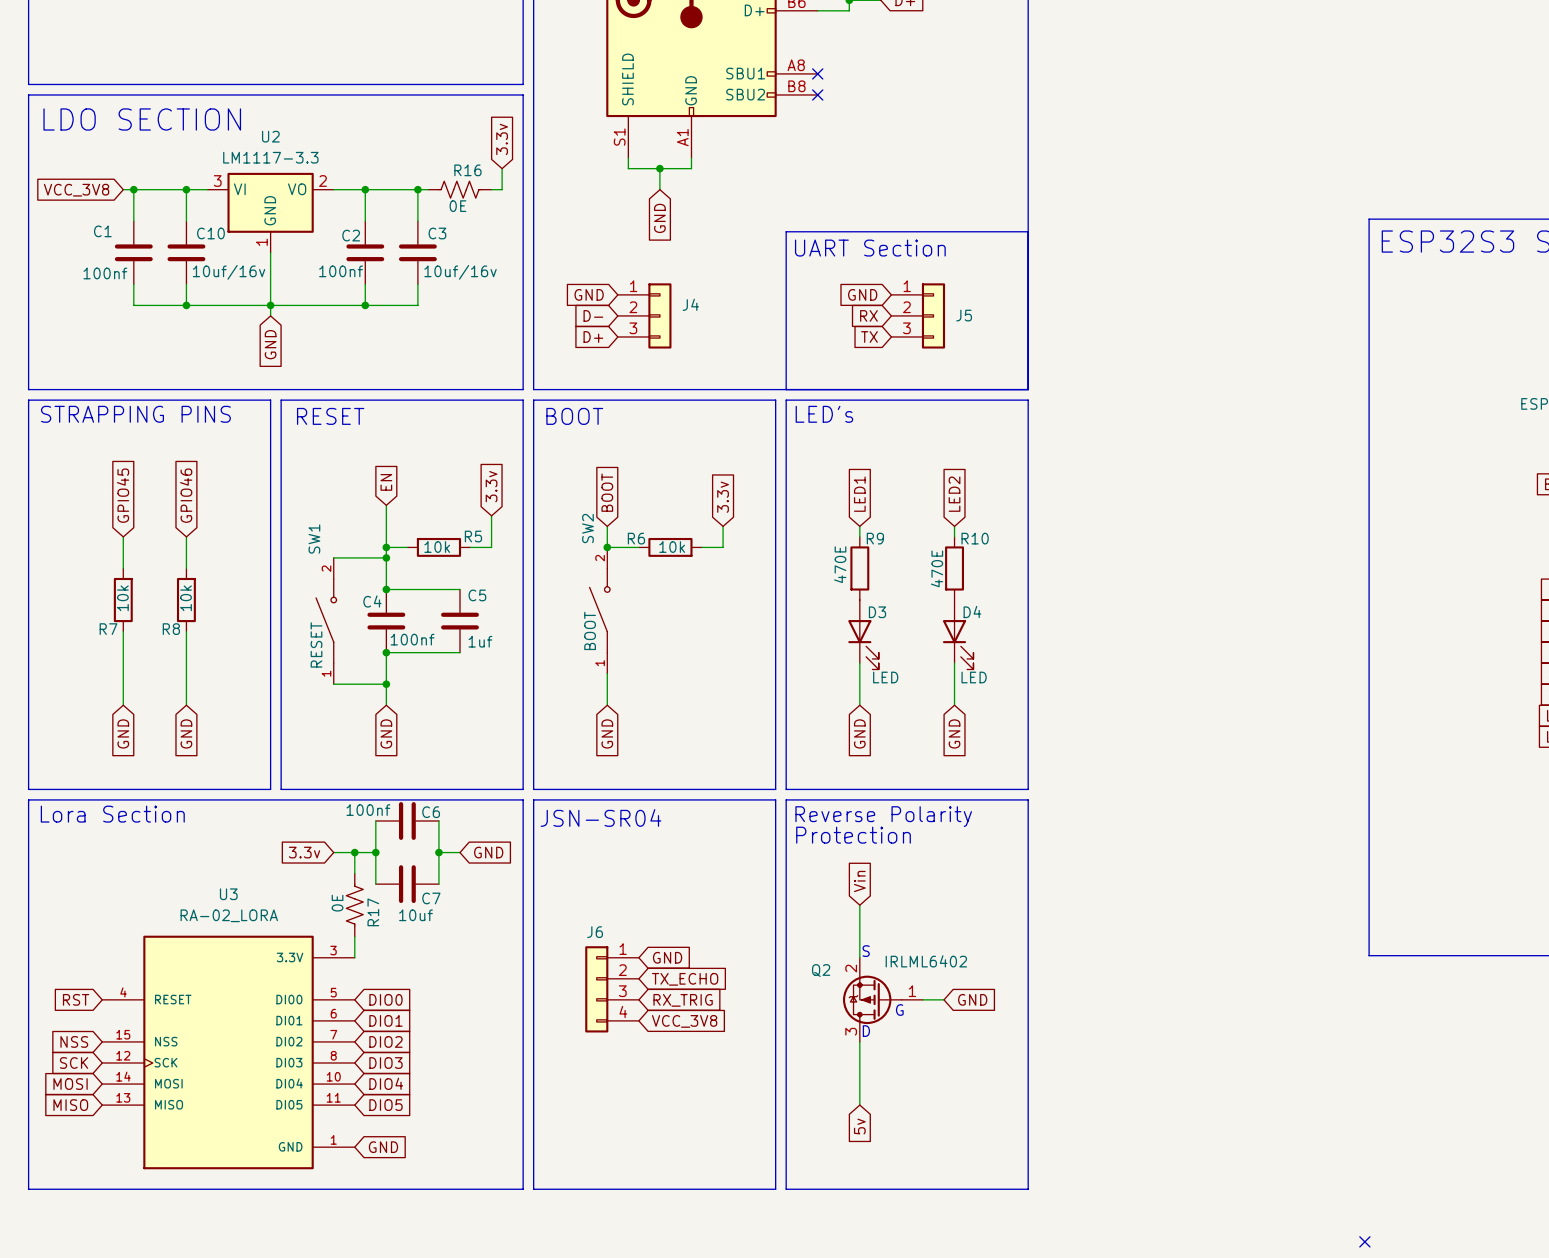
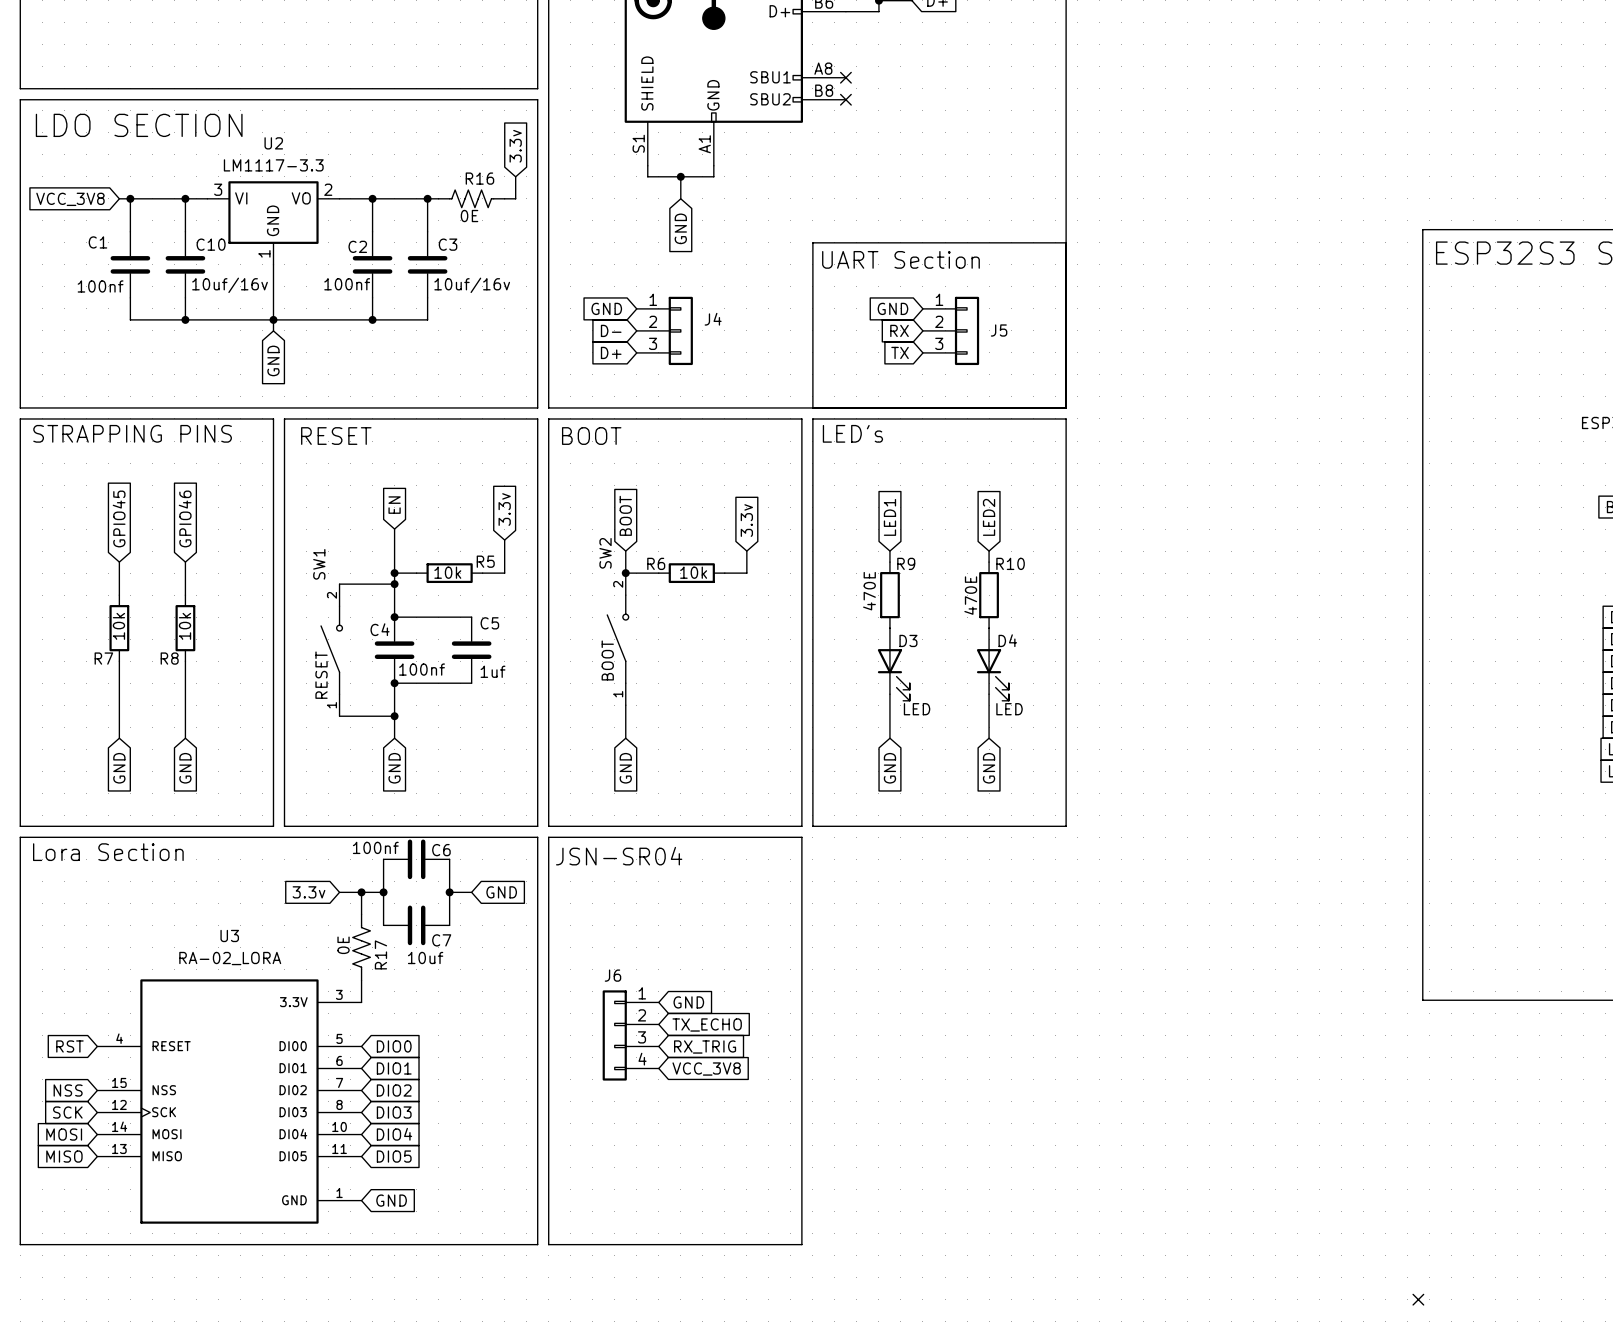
line: (786, 799) (1028, 799) (1028, 1189) (786, 1189) (786, 799) -> none
text: Reverse Polarity (883, 816) -> none
text: Protection (853, 835) -> none
global label: Vin (859, 881) -> none
wire: (859, 905) (859, 957) -> none
text: S (866, 951) -> none
Q2: IRLML6402 (882, 999) -> none
wire: (922, 999) (944, 999) -> none
global label: GND (972, 999) -> none
text: G (899, 1010) -> none
text: D (866, 1031) -> none
wire: (859, 1041) (859, 1105) -> none
global label: 5v (859, 1126) -> none

